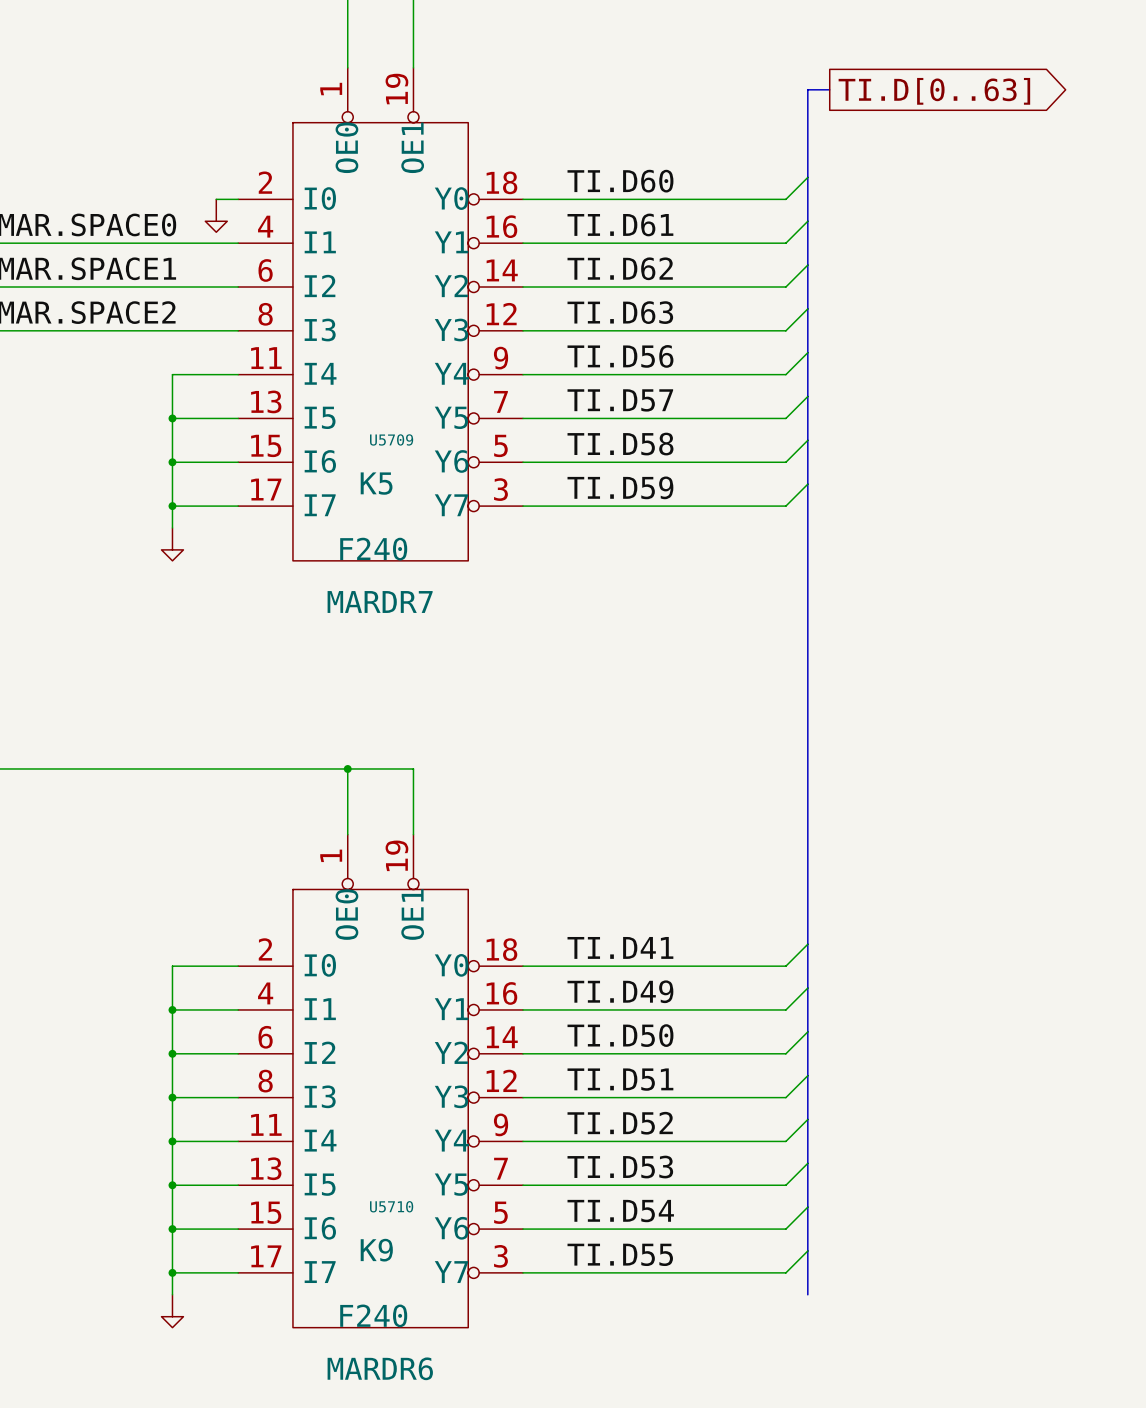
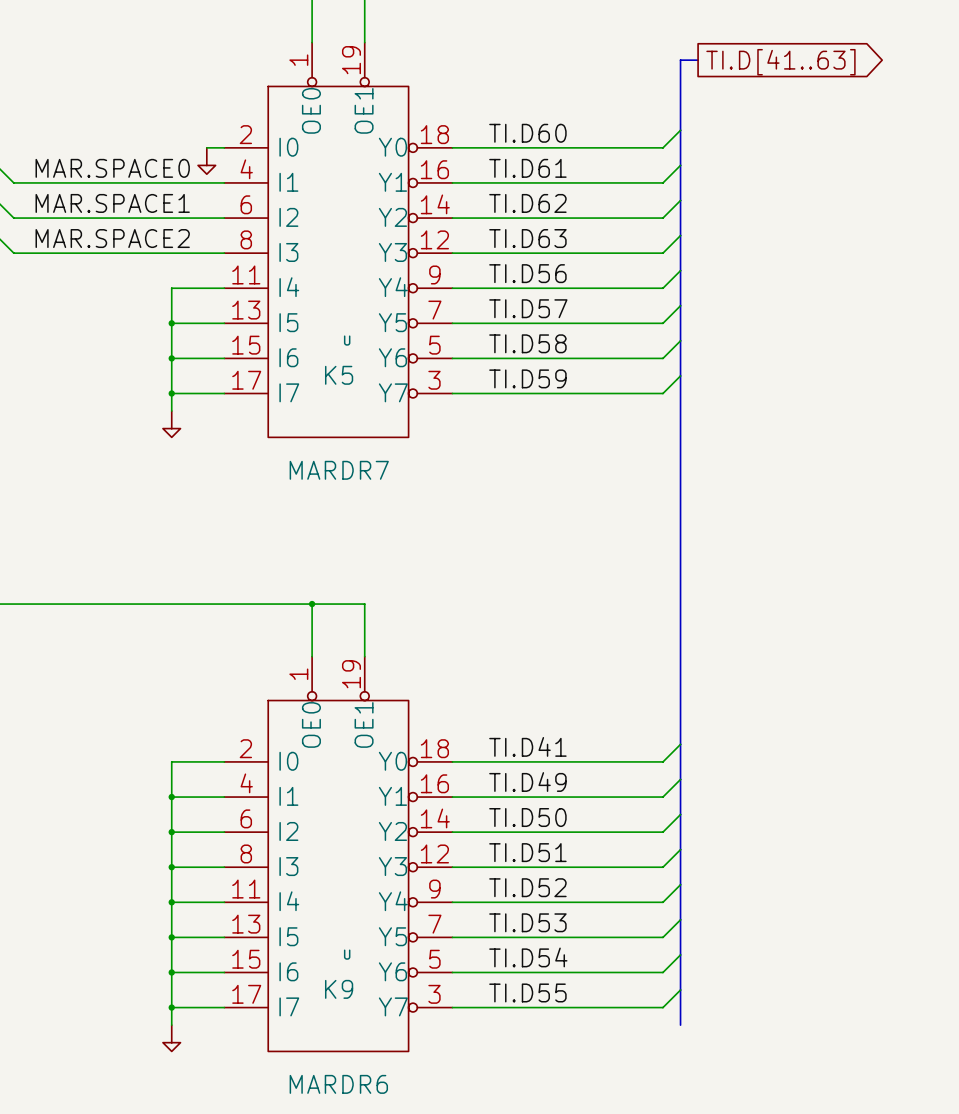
global label: TI.D[0..63] (934, 91) -> TI.D[41..63] (780, 62)
U5709 name: U5709 (391, 439) -> U (347, 340)
U5709 value: F240 (373, 549) -> none
U5710 name: U5710 (391, 1206) -> U (347, 954)
U5710 value: F240 (373, 1315) -> none

